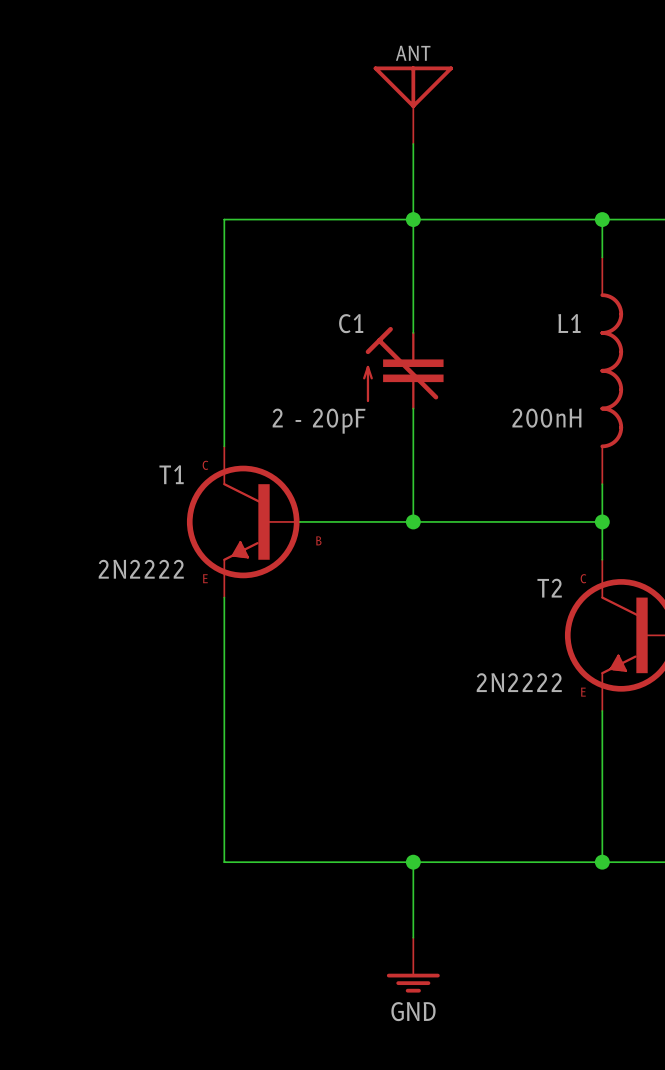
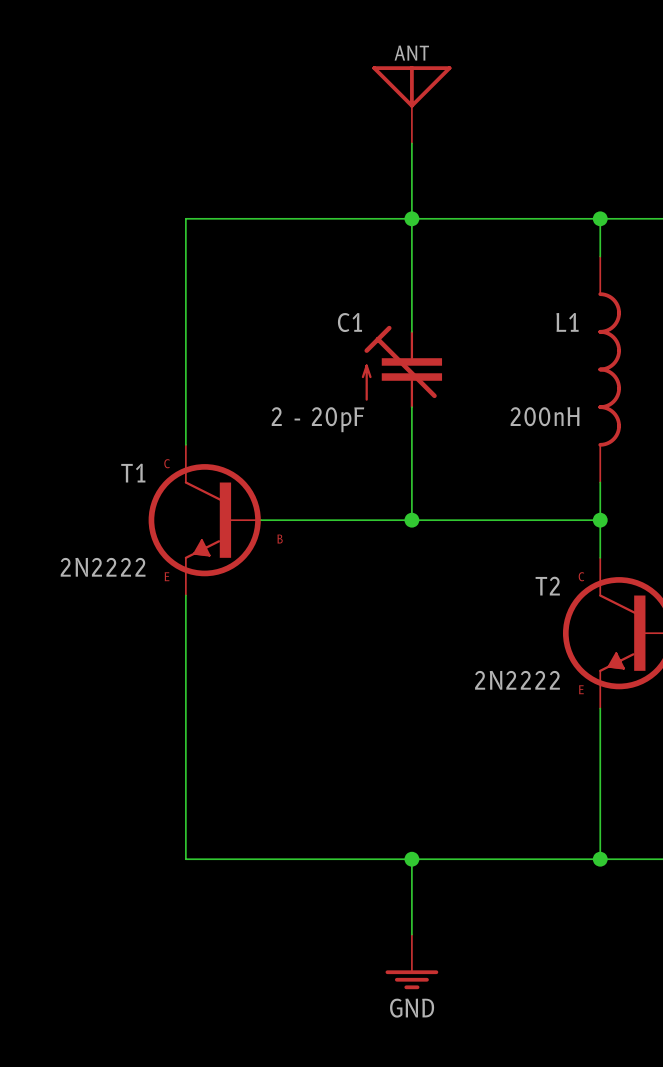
wire: (224, 219) (224, 446) -> (223, 218) (185, 218) (185, 444)
T1 position: (243, 521) -> (204, 520)
wire: (224, 597) (224, 862) -> (185, 595) (185, 859) (223, 859)

